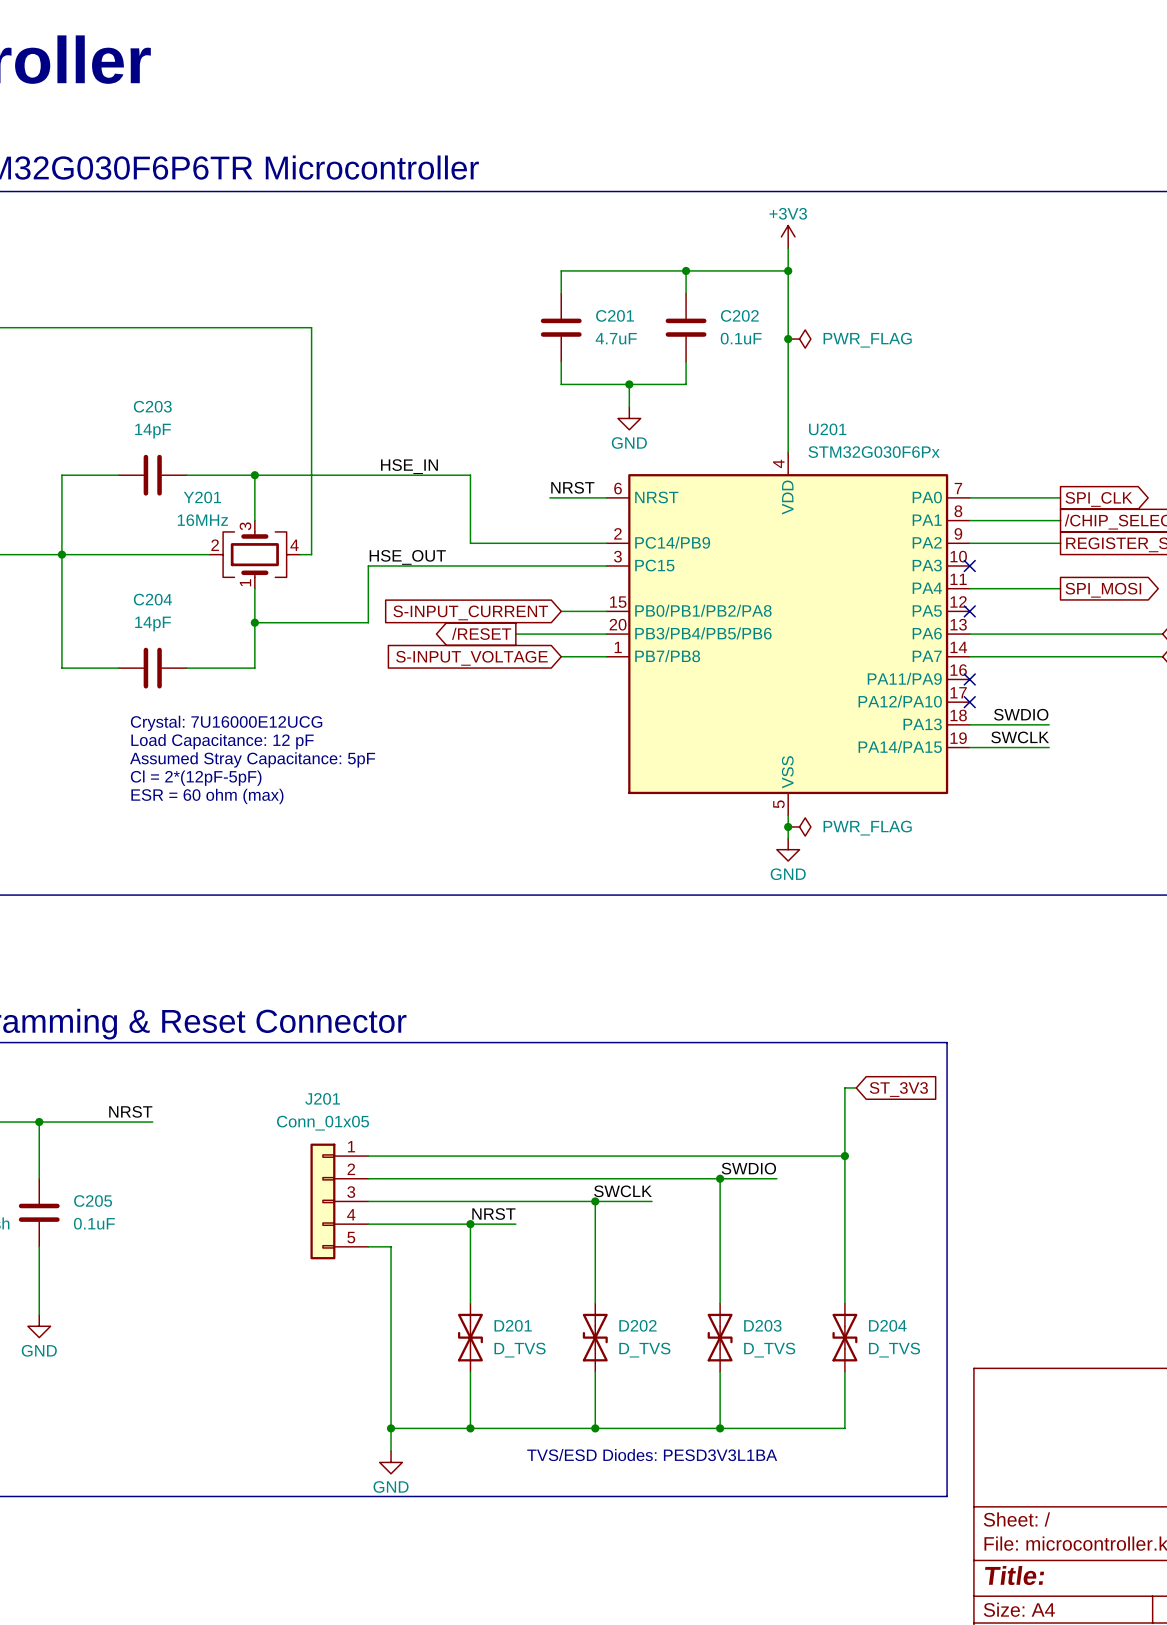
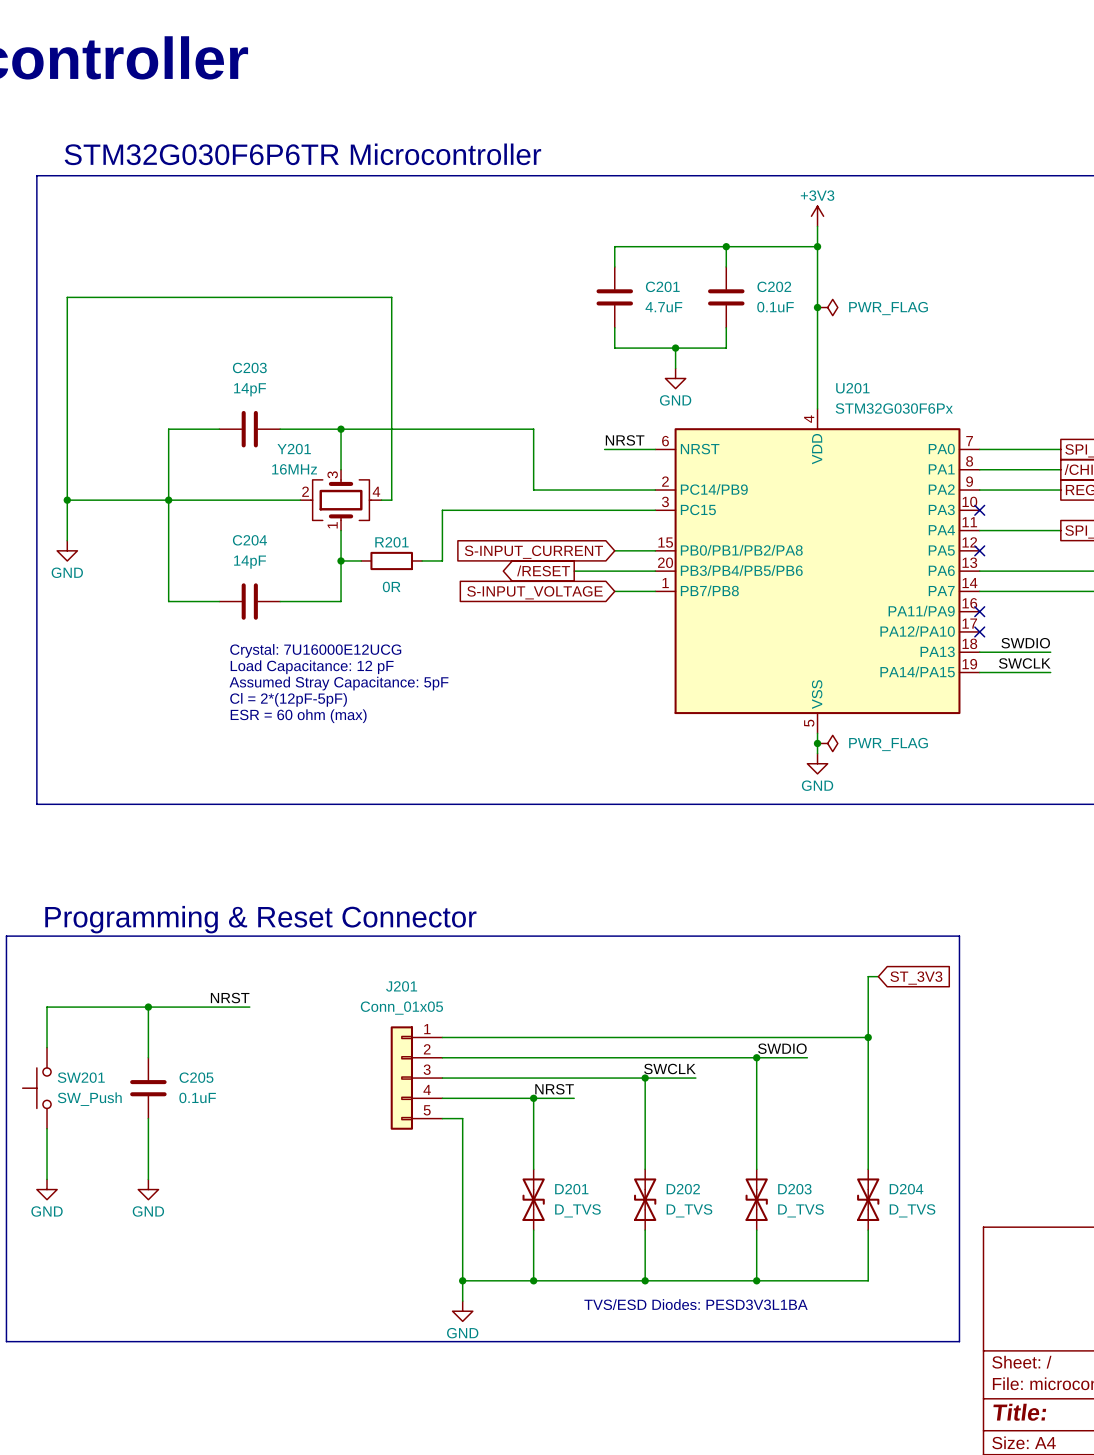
label: HSE_IN (409, 466) -> none
label: HSE_OUT (407, 557) -> none
wire: (277, 622) (345, 622) -> none
R201: none -> 0R (391, 560)

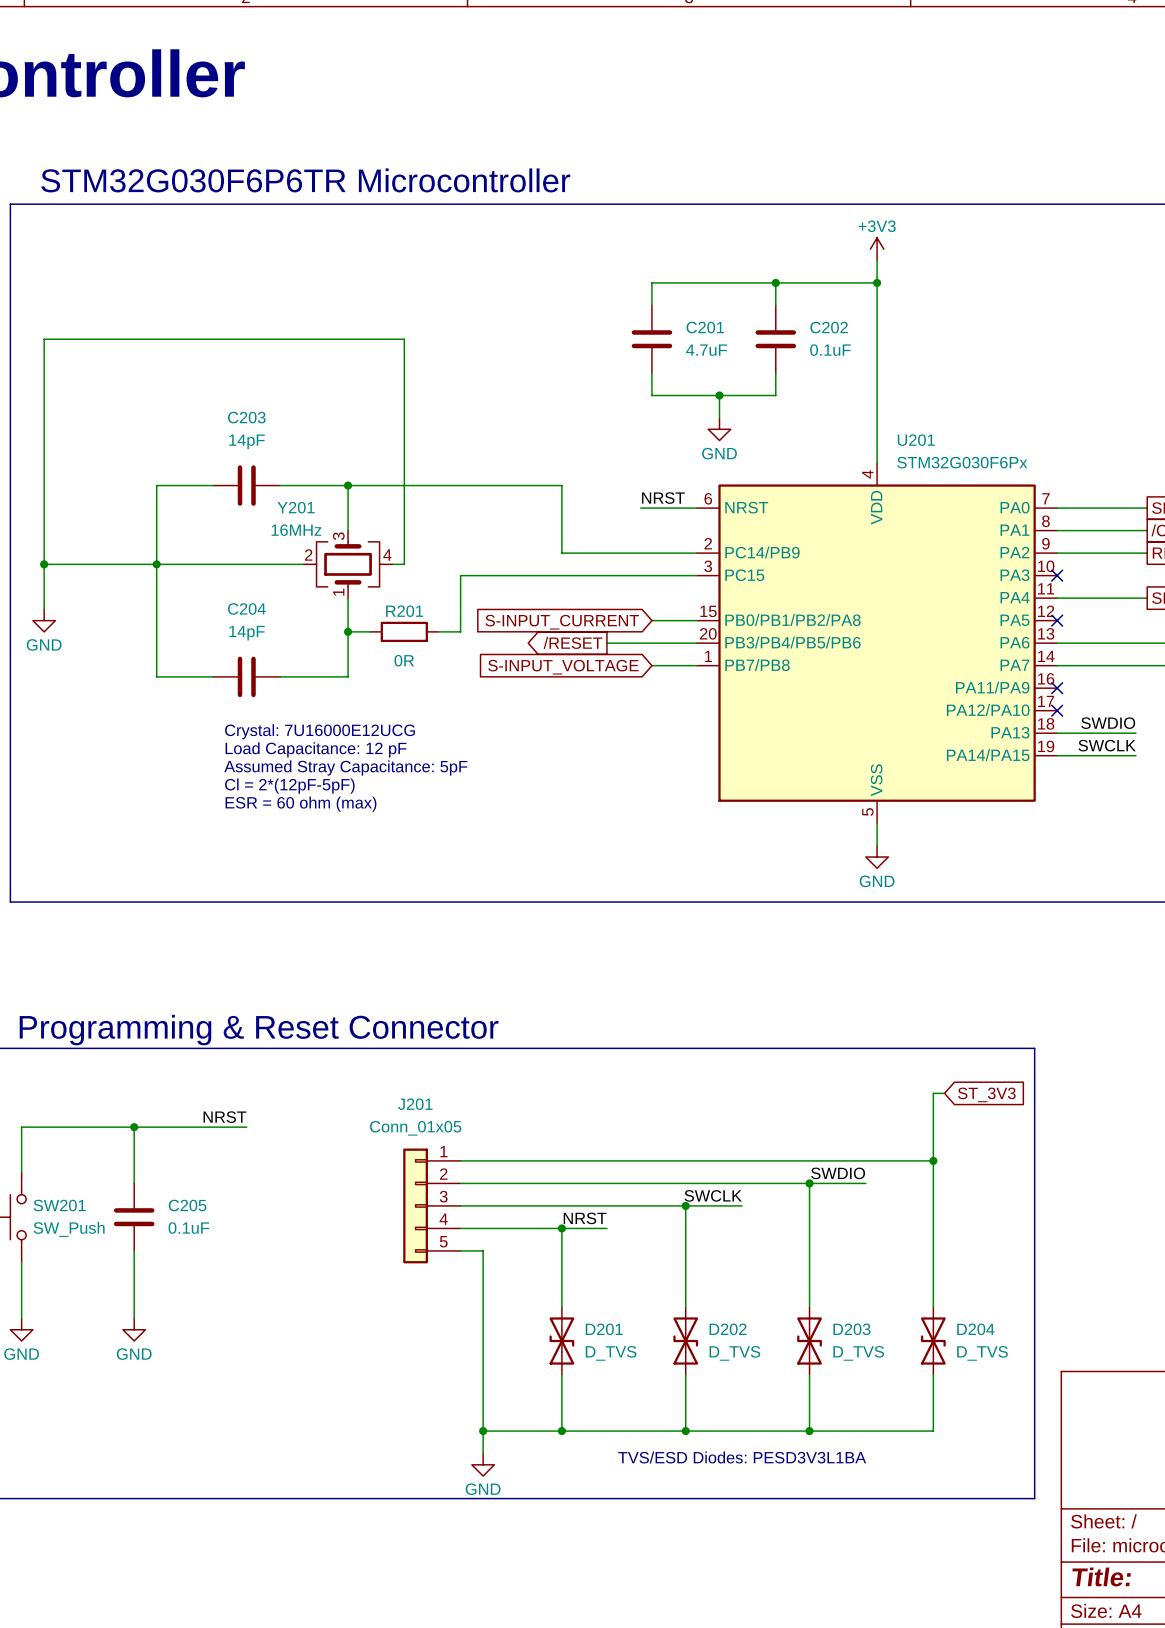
junction: (817, 307) -> none
power symbol: PWR_FLAG (827, 307) -> none
junction: (817, 743) -> none
power symbol: PWR_FLAG (827, 743) -> none

